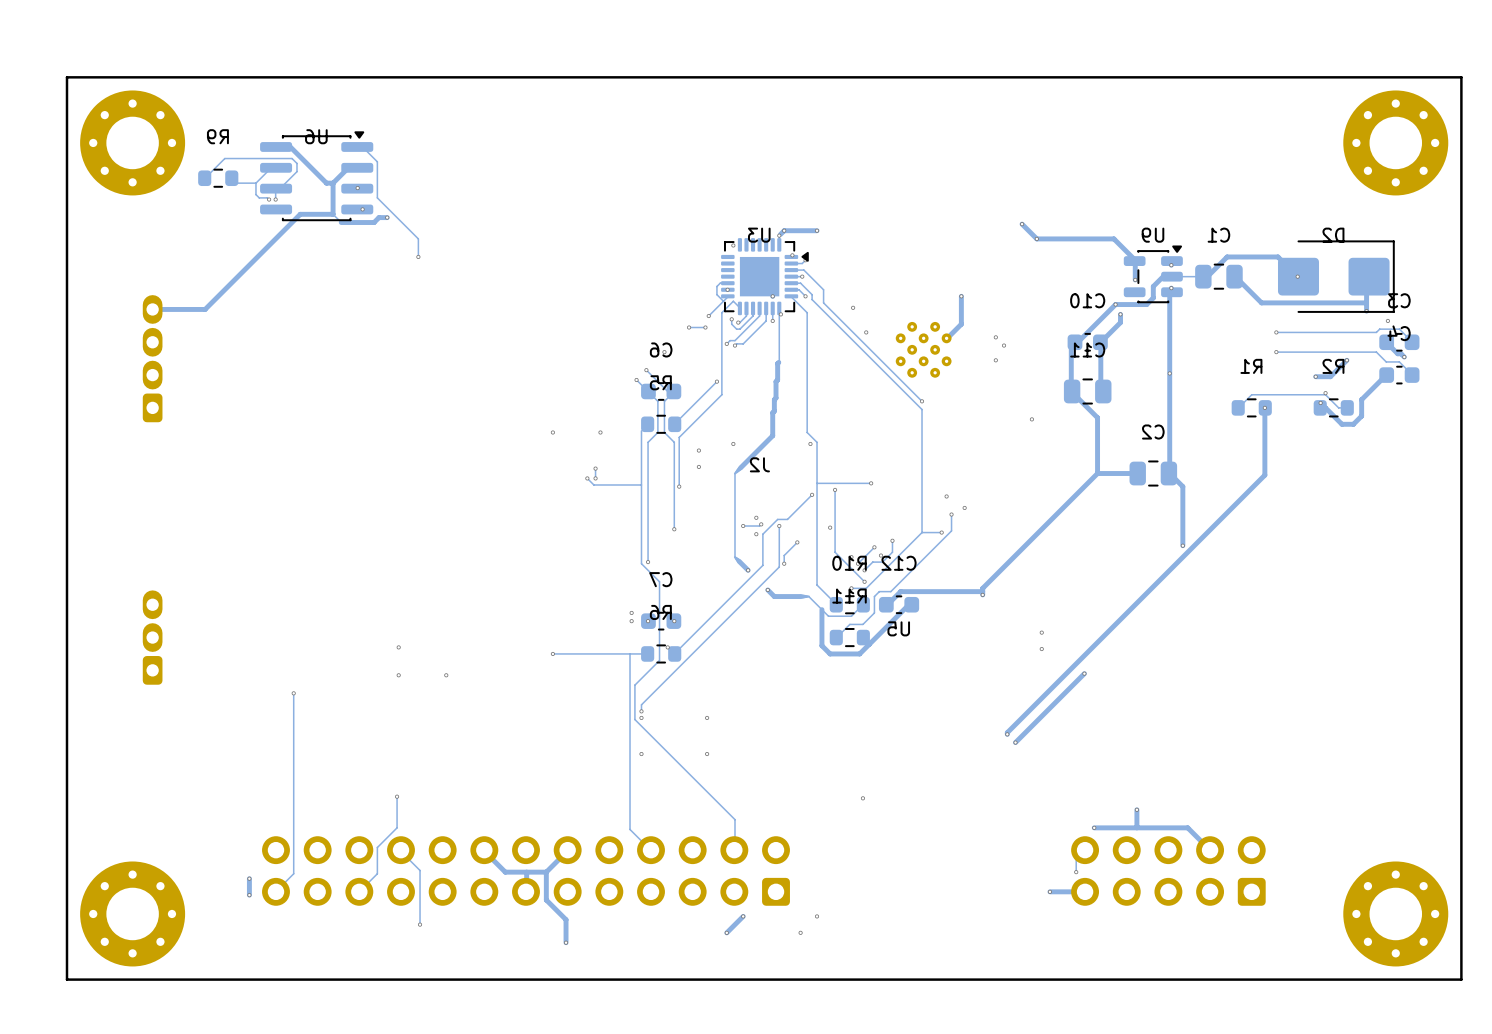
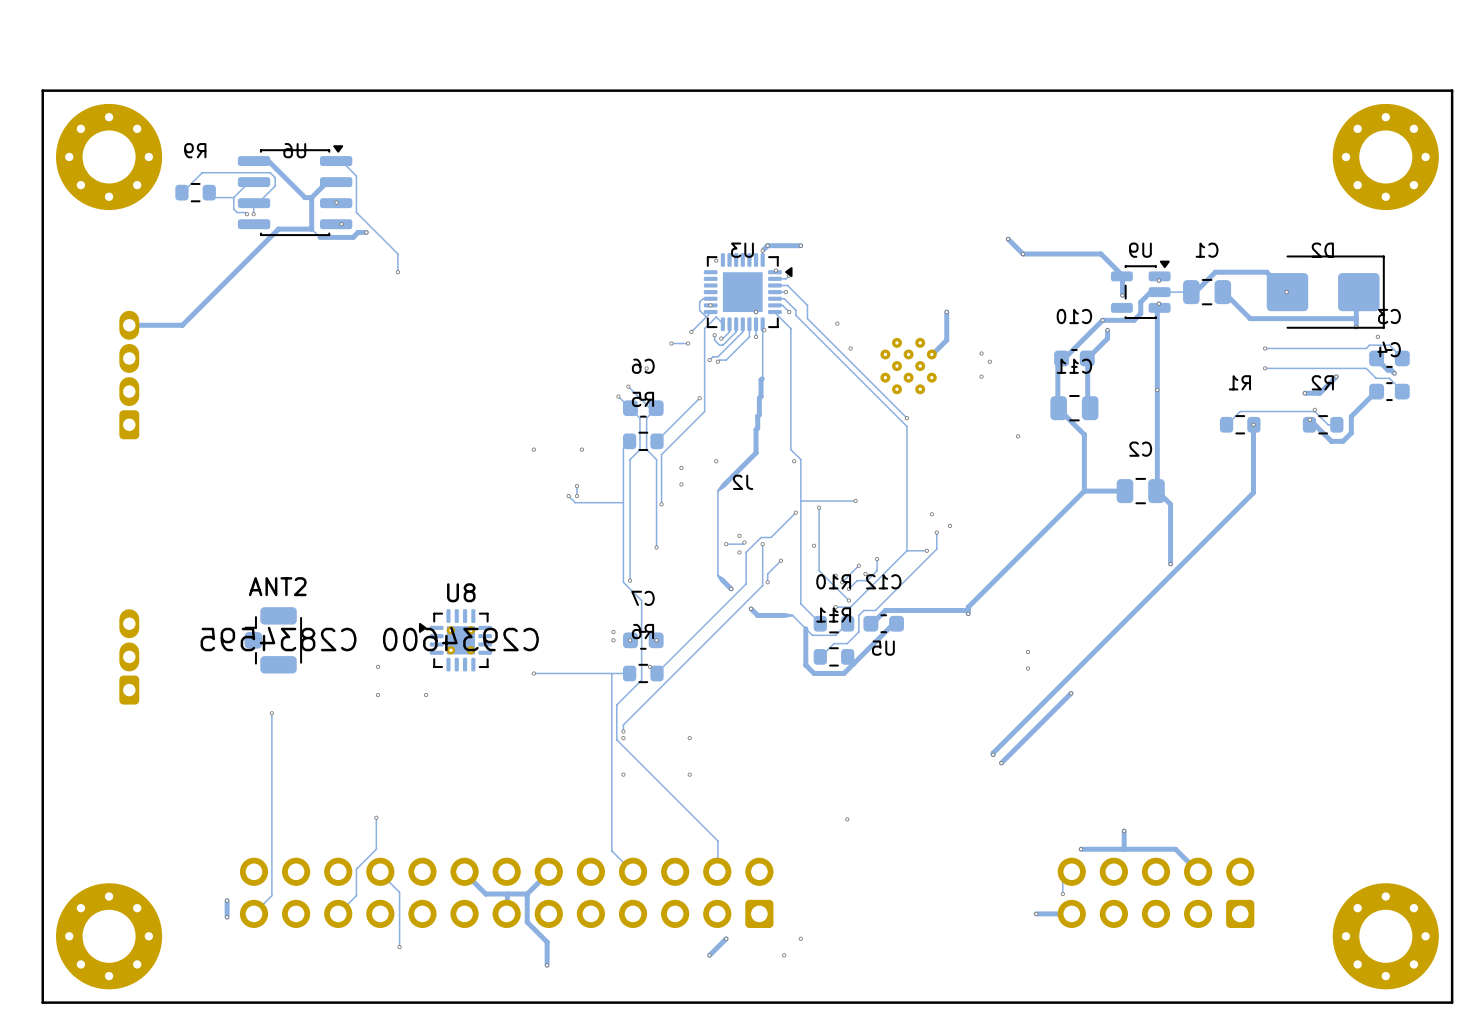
ANT2: none -> (273, 640)
U8: none -> (455, 640)

